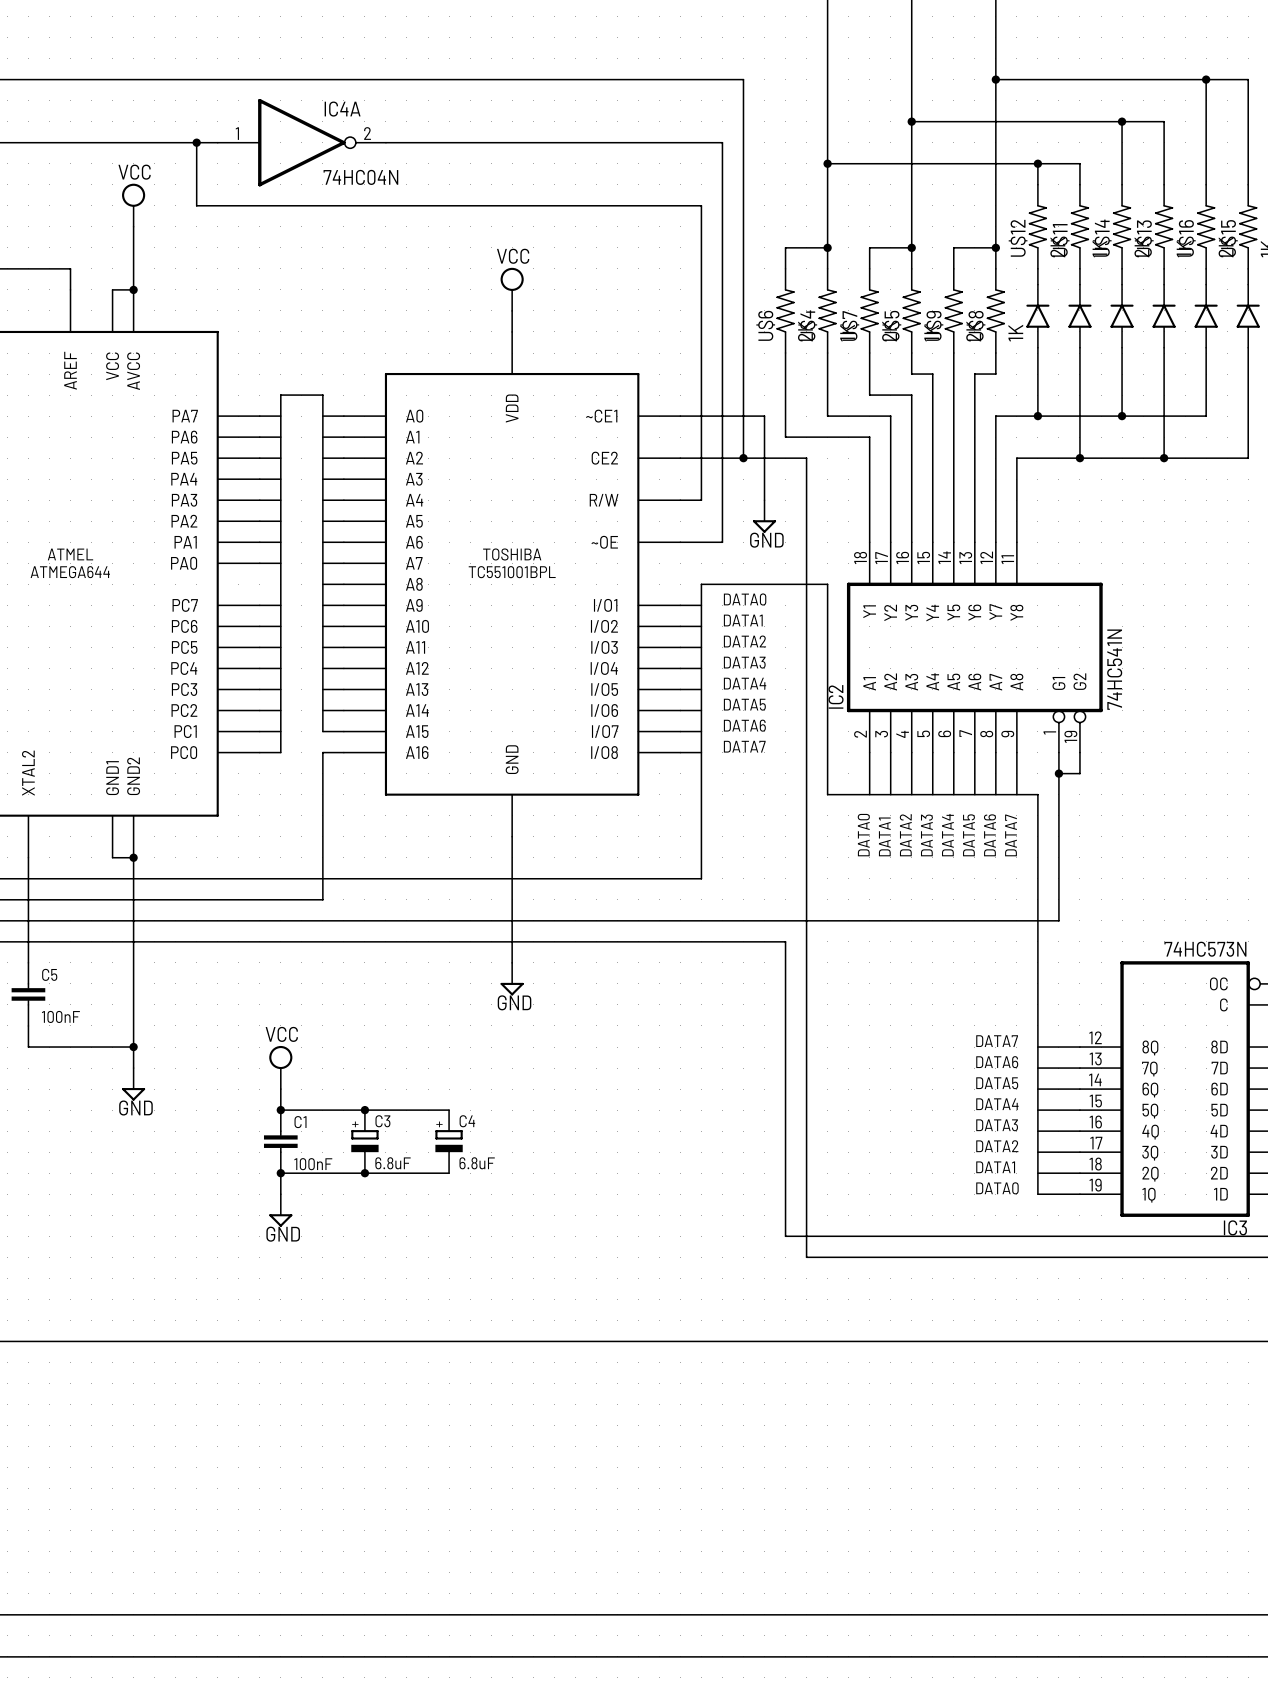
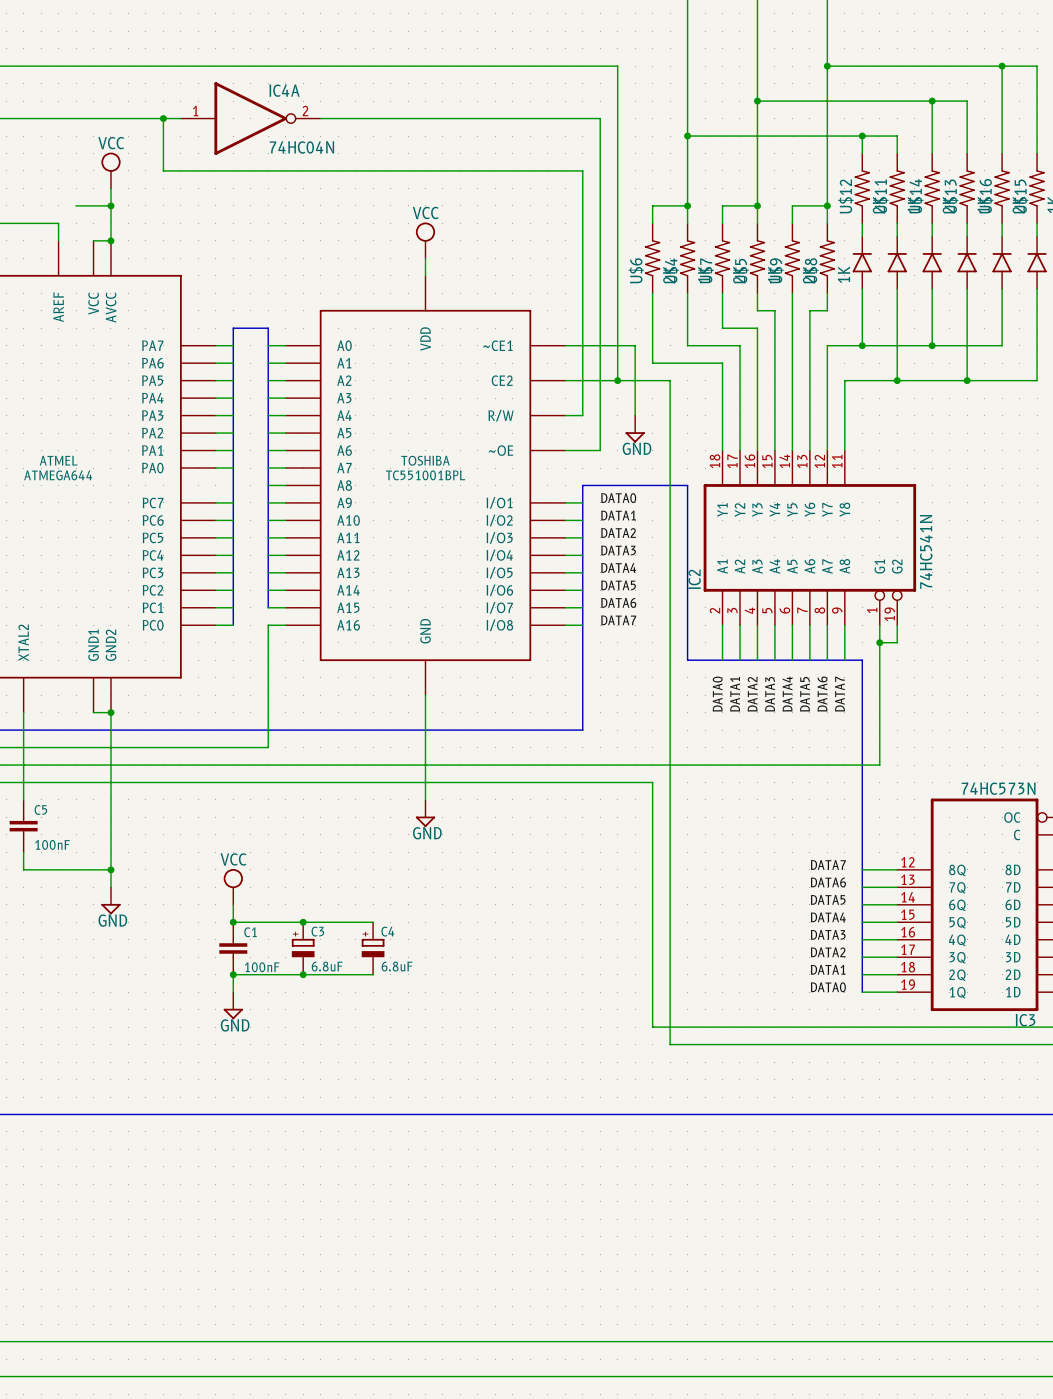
wire: none -> (76, 205) (110, 205)
junction: none -> (110, 205)

